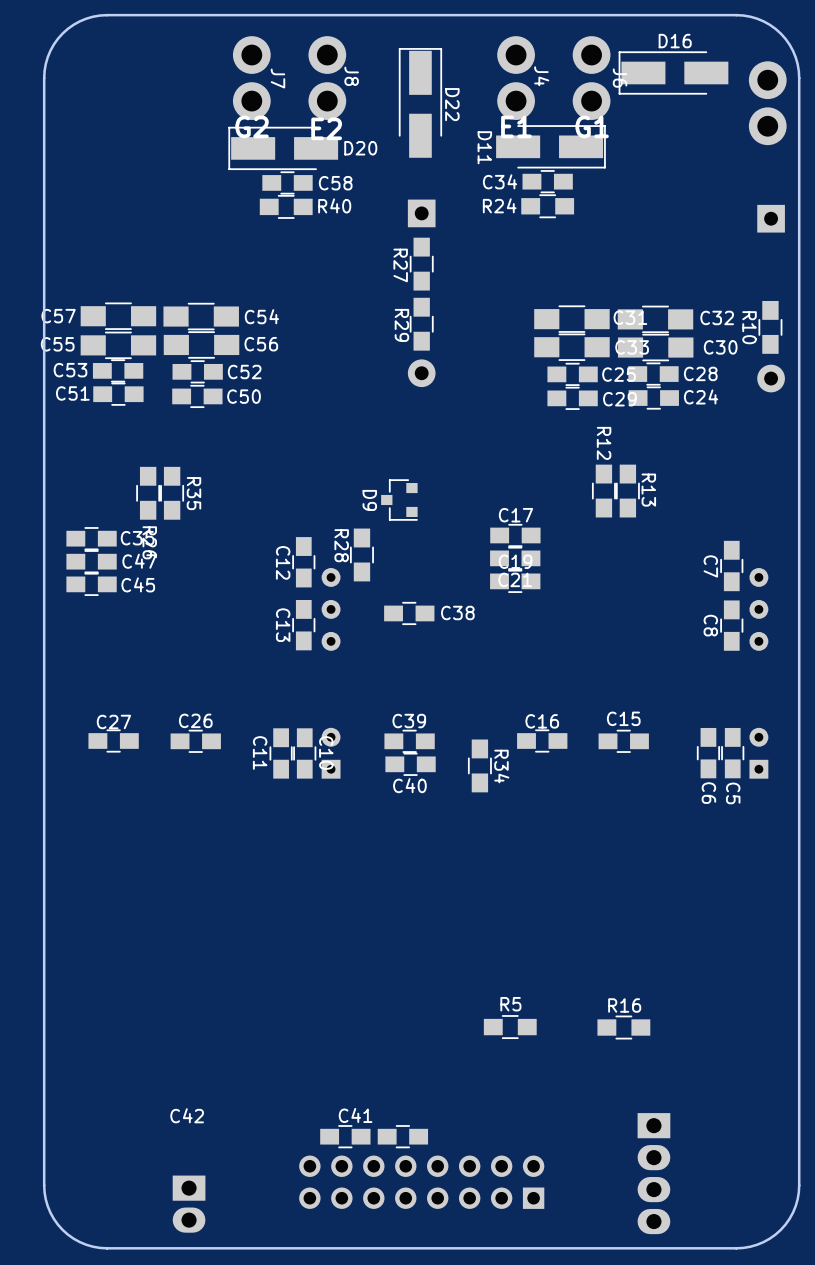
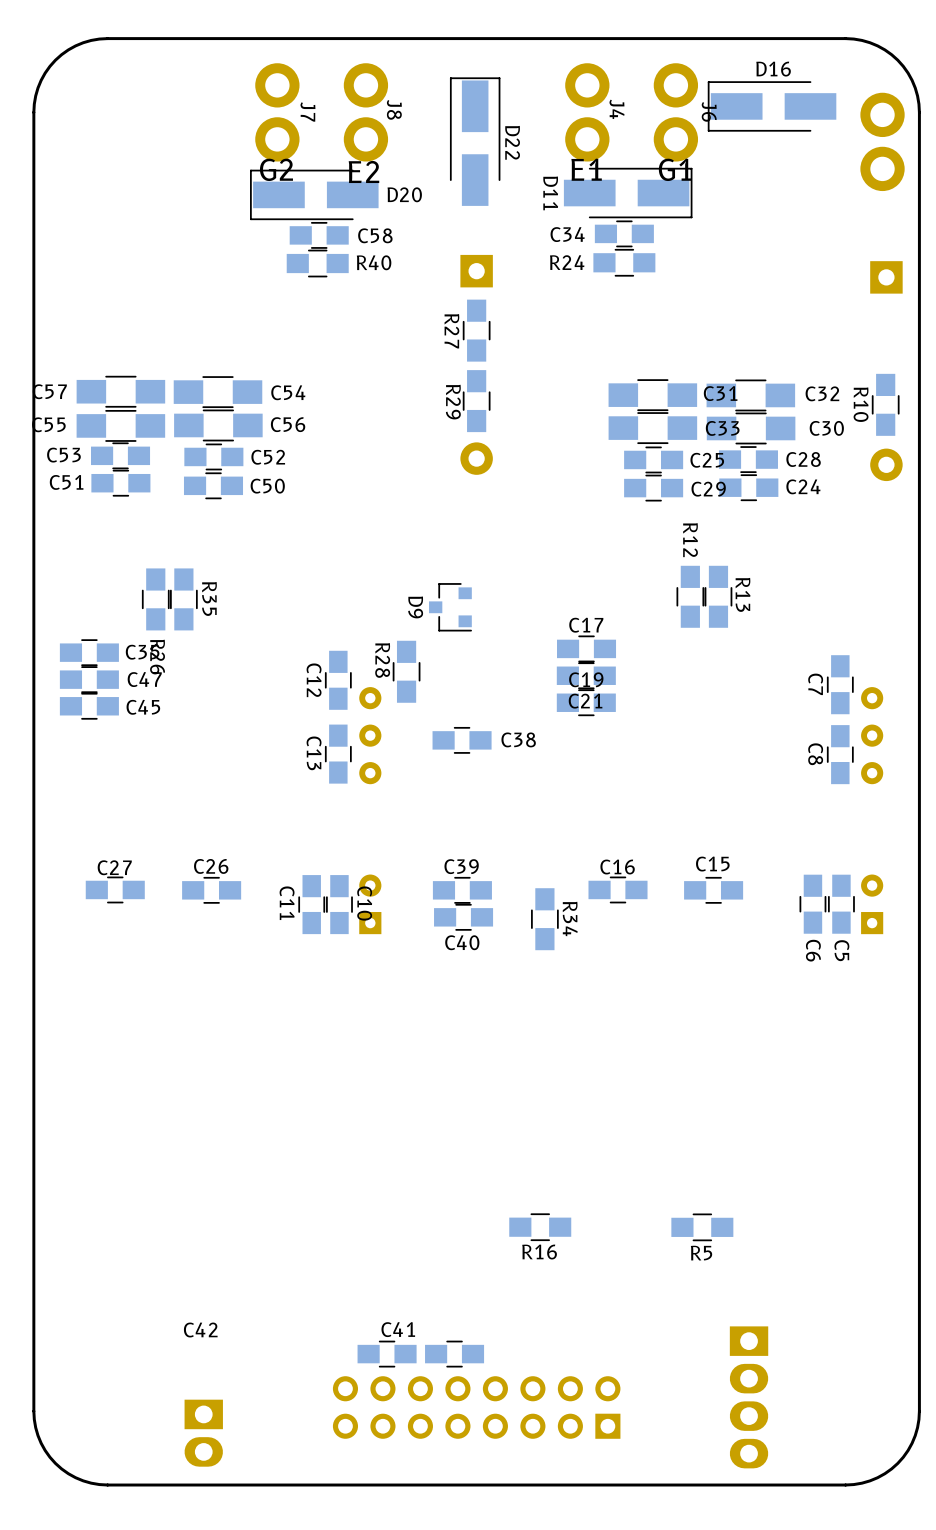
R5 name position: R5 (510, 1004) -> R5 (701, 1253)
R16 name position: R16 (624, 1005) -> R16 (539, 1252)
R5 position: (510, 1027) -> (702, 1227)
R16 position: (623, 1027) -> (540, 1227)

